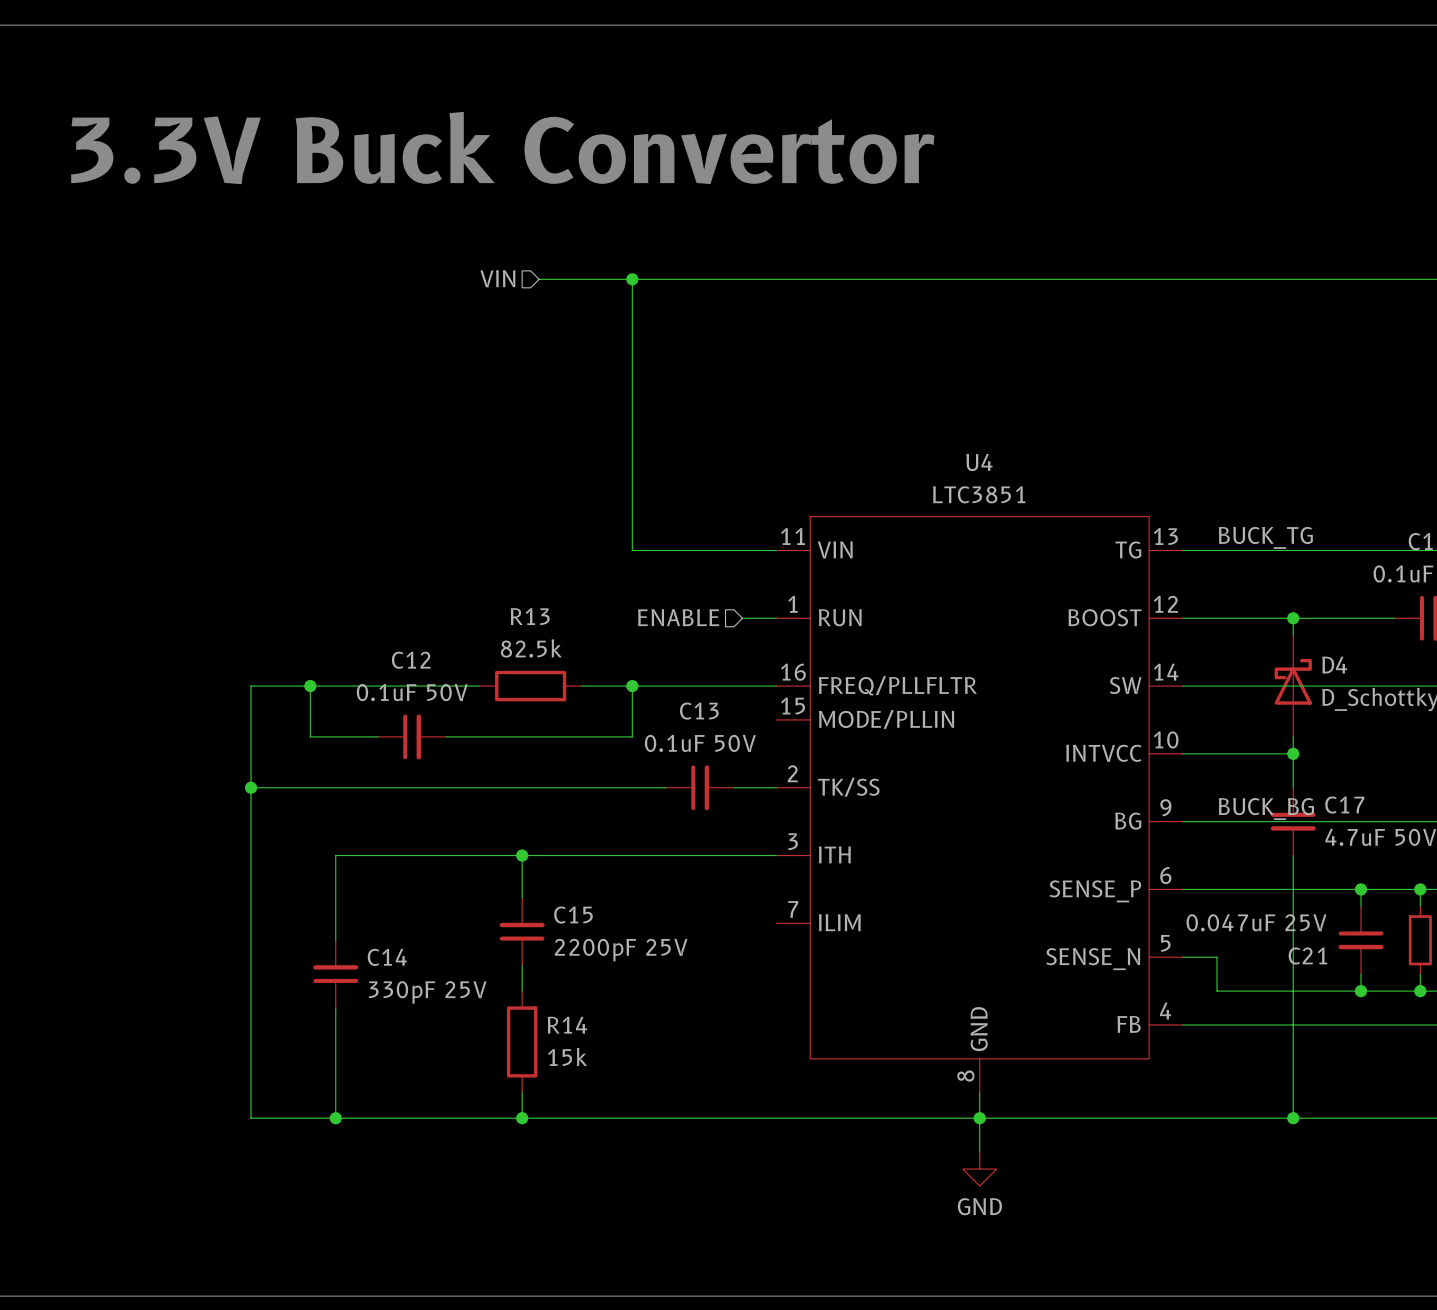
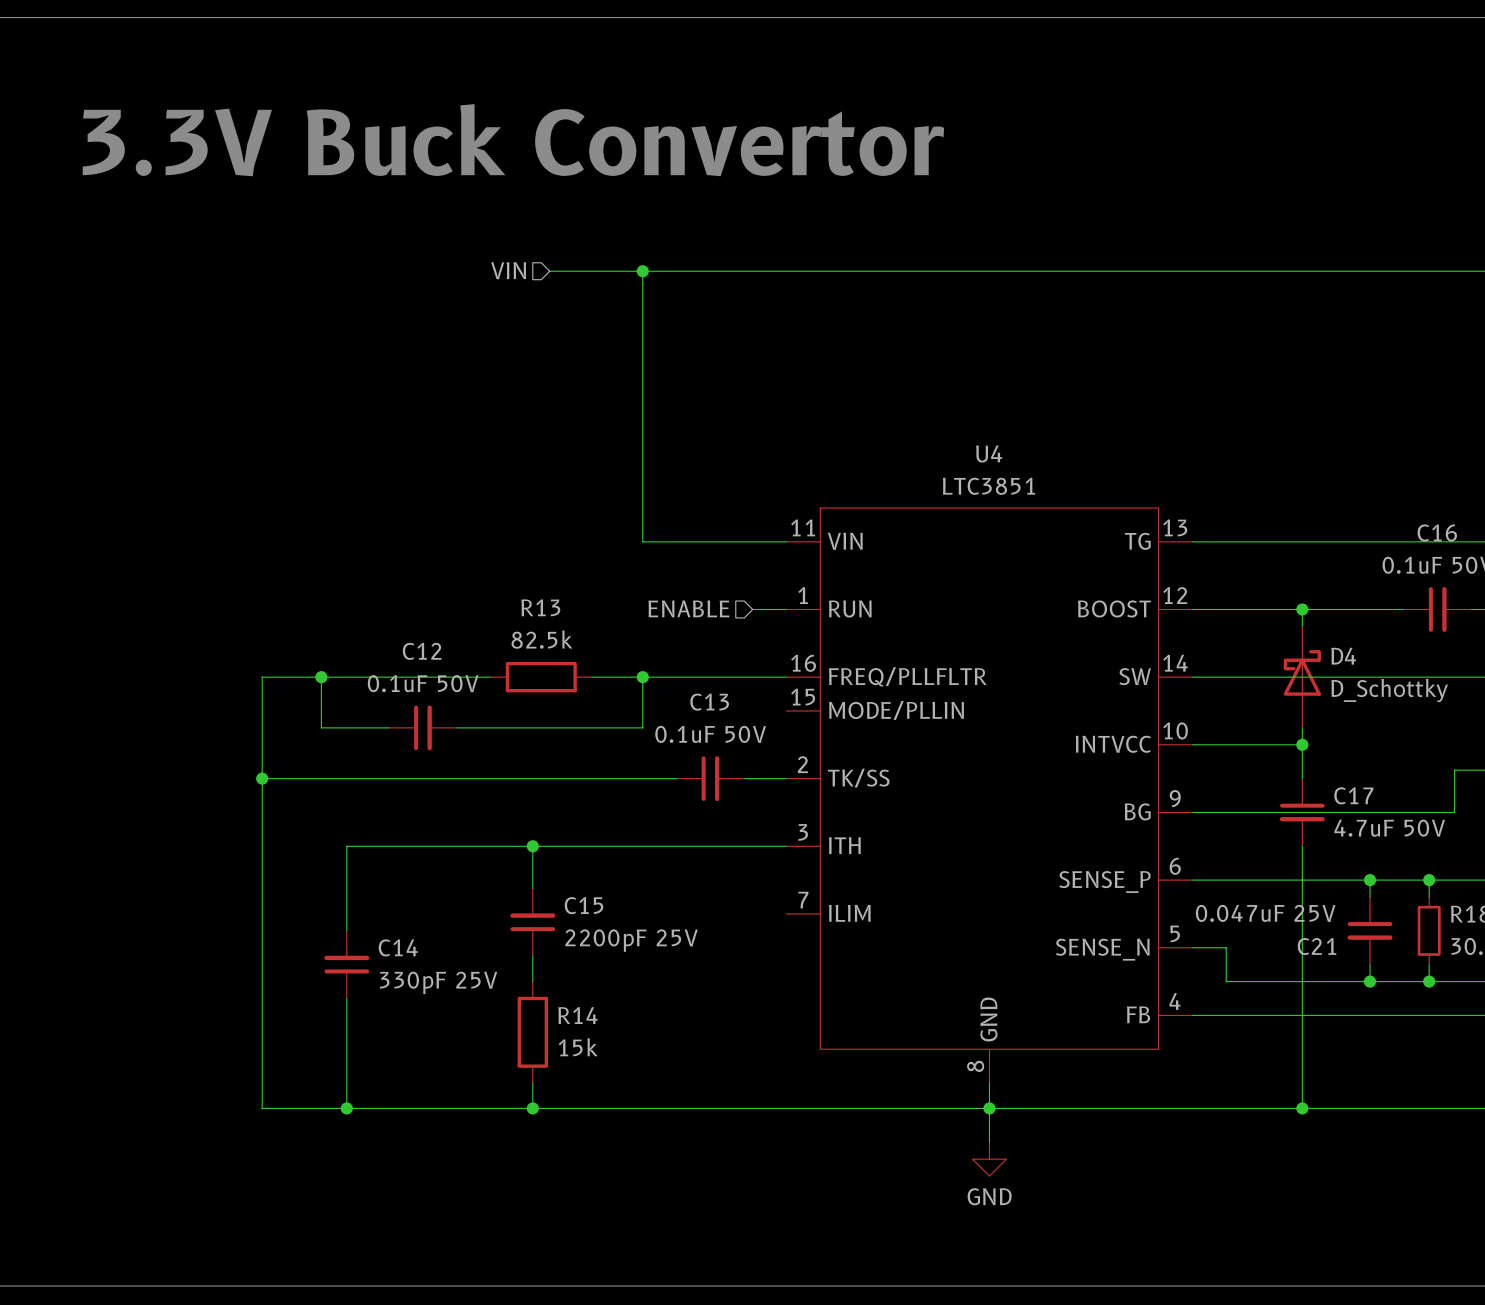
label: BUCK_TG (1265, 537) -> none
label: BUCK_BG (1266, 809) -> none

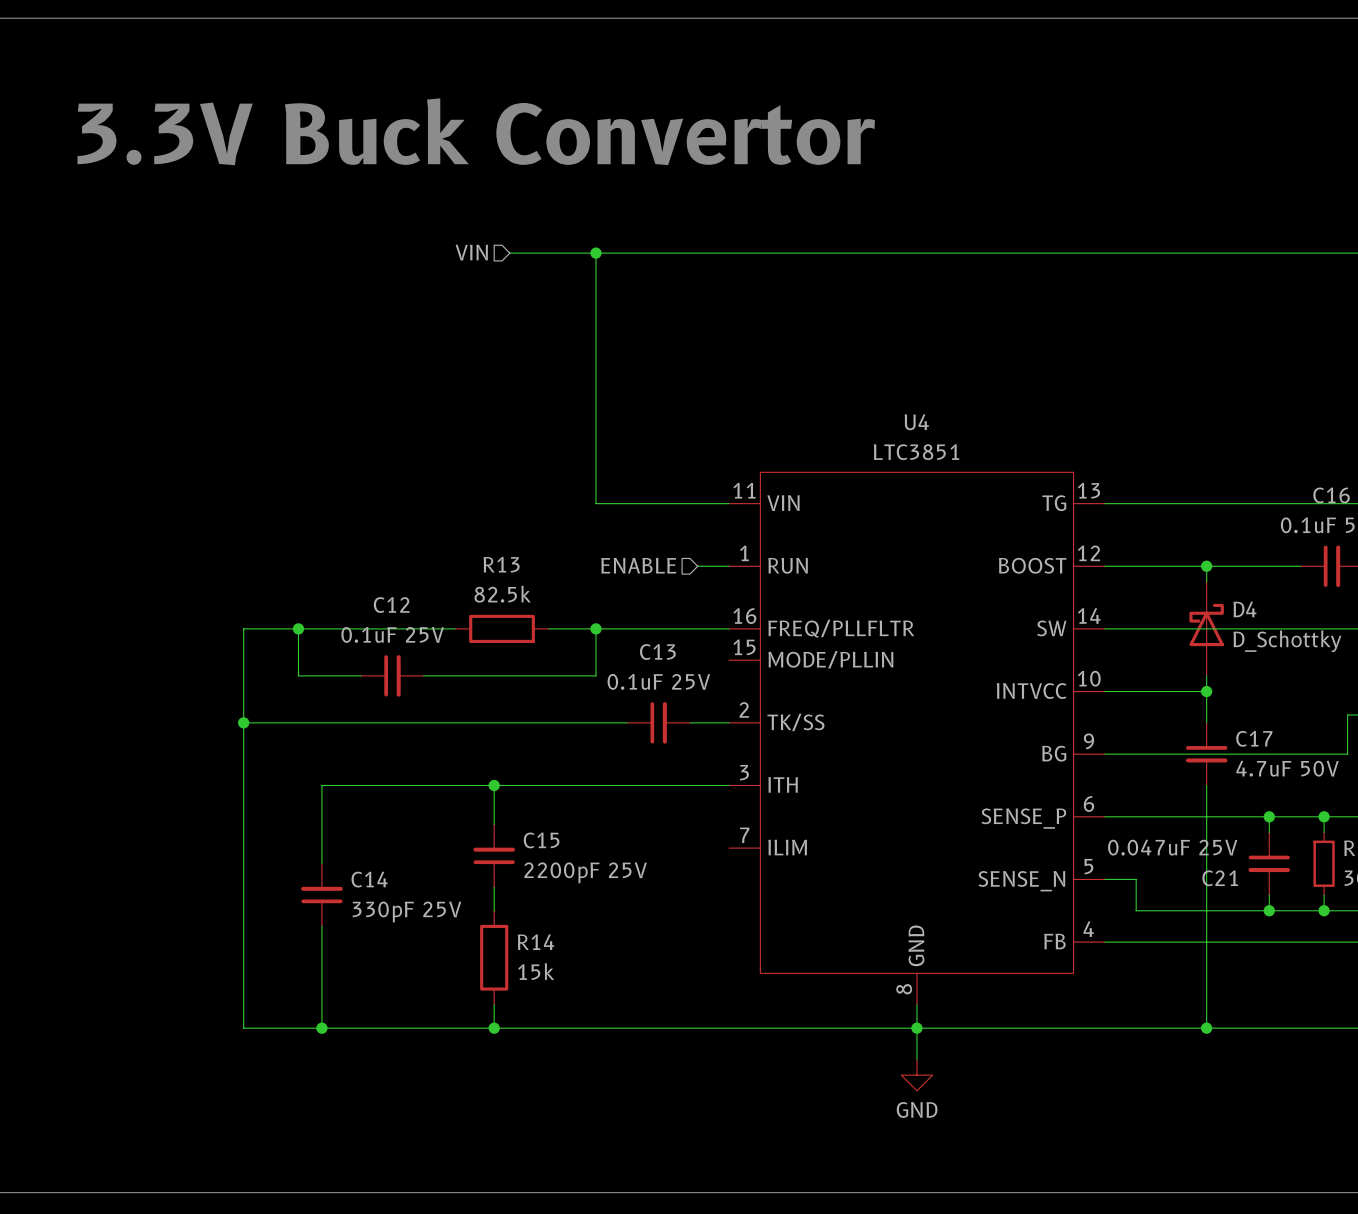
C12 value: 0.1uF 50V (423, 683) -> 0.1uF 25V (392, 634)
C13 value: 0.1uF 50V (710, 734) -> 0.1uF 25V (658, 681)

